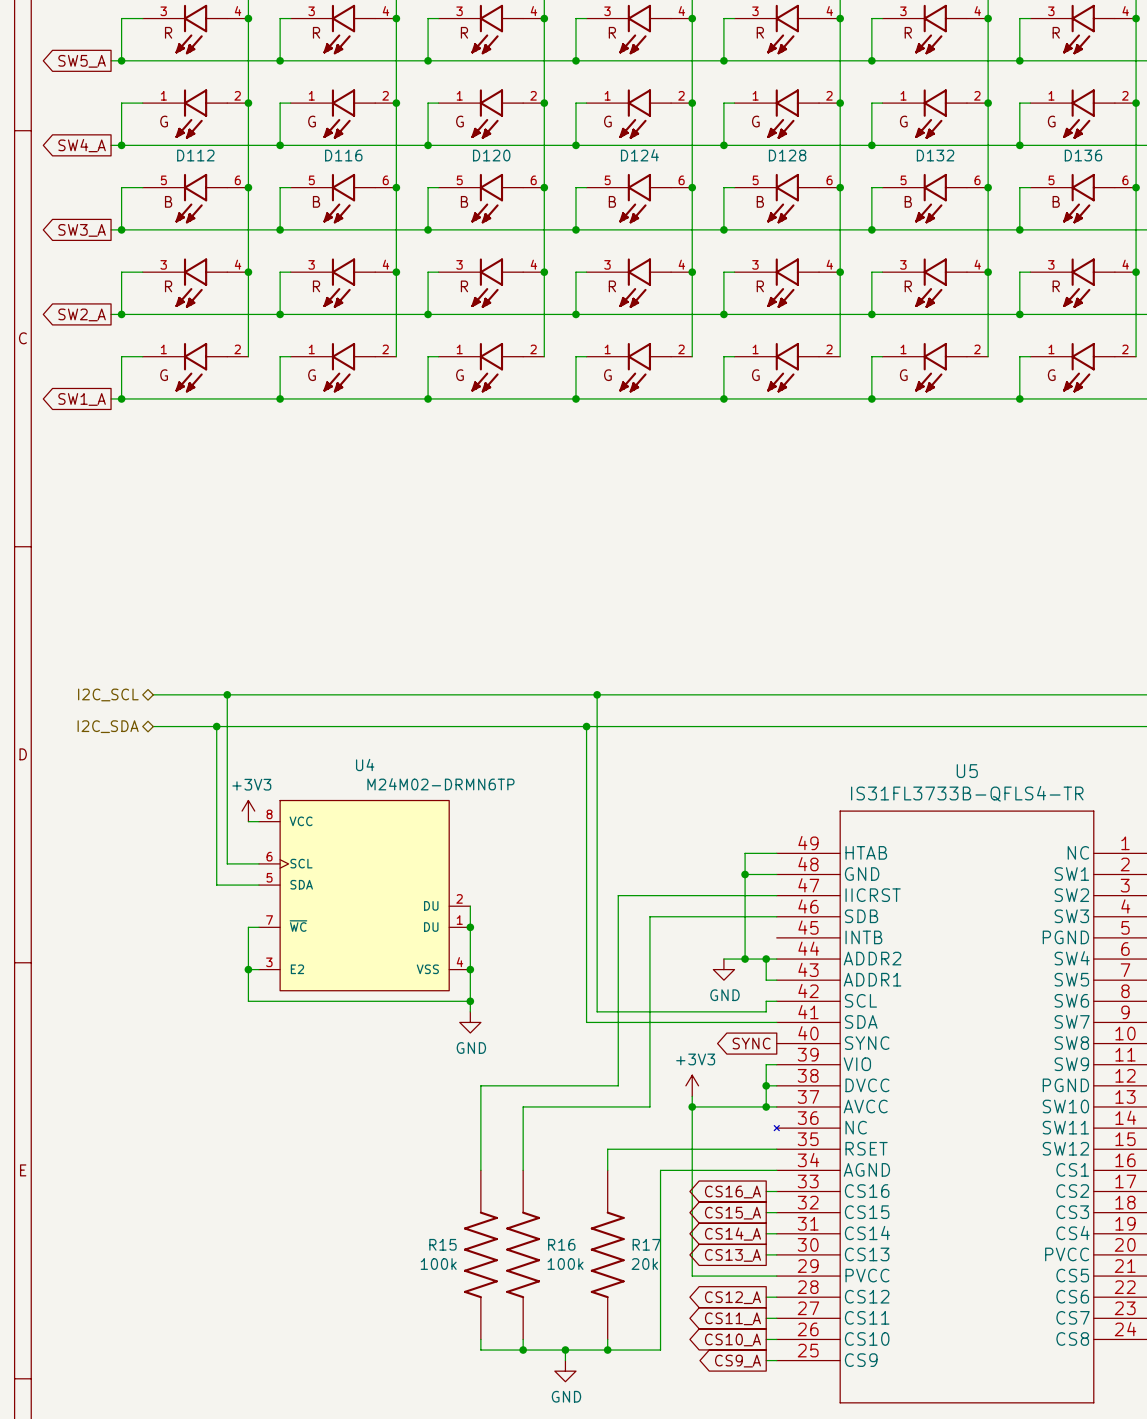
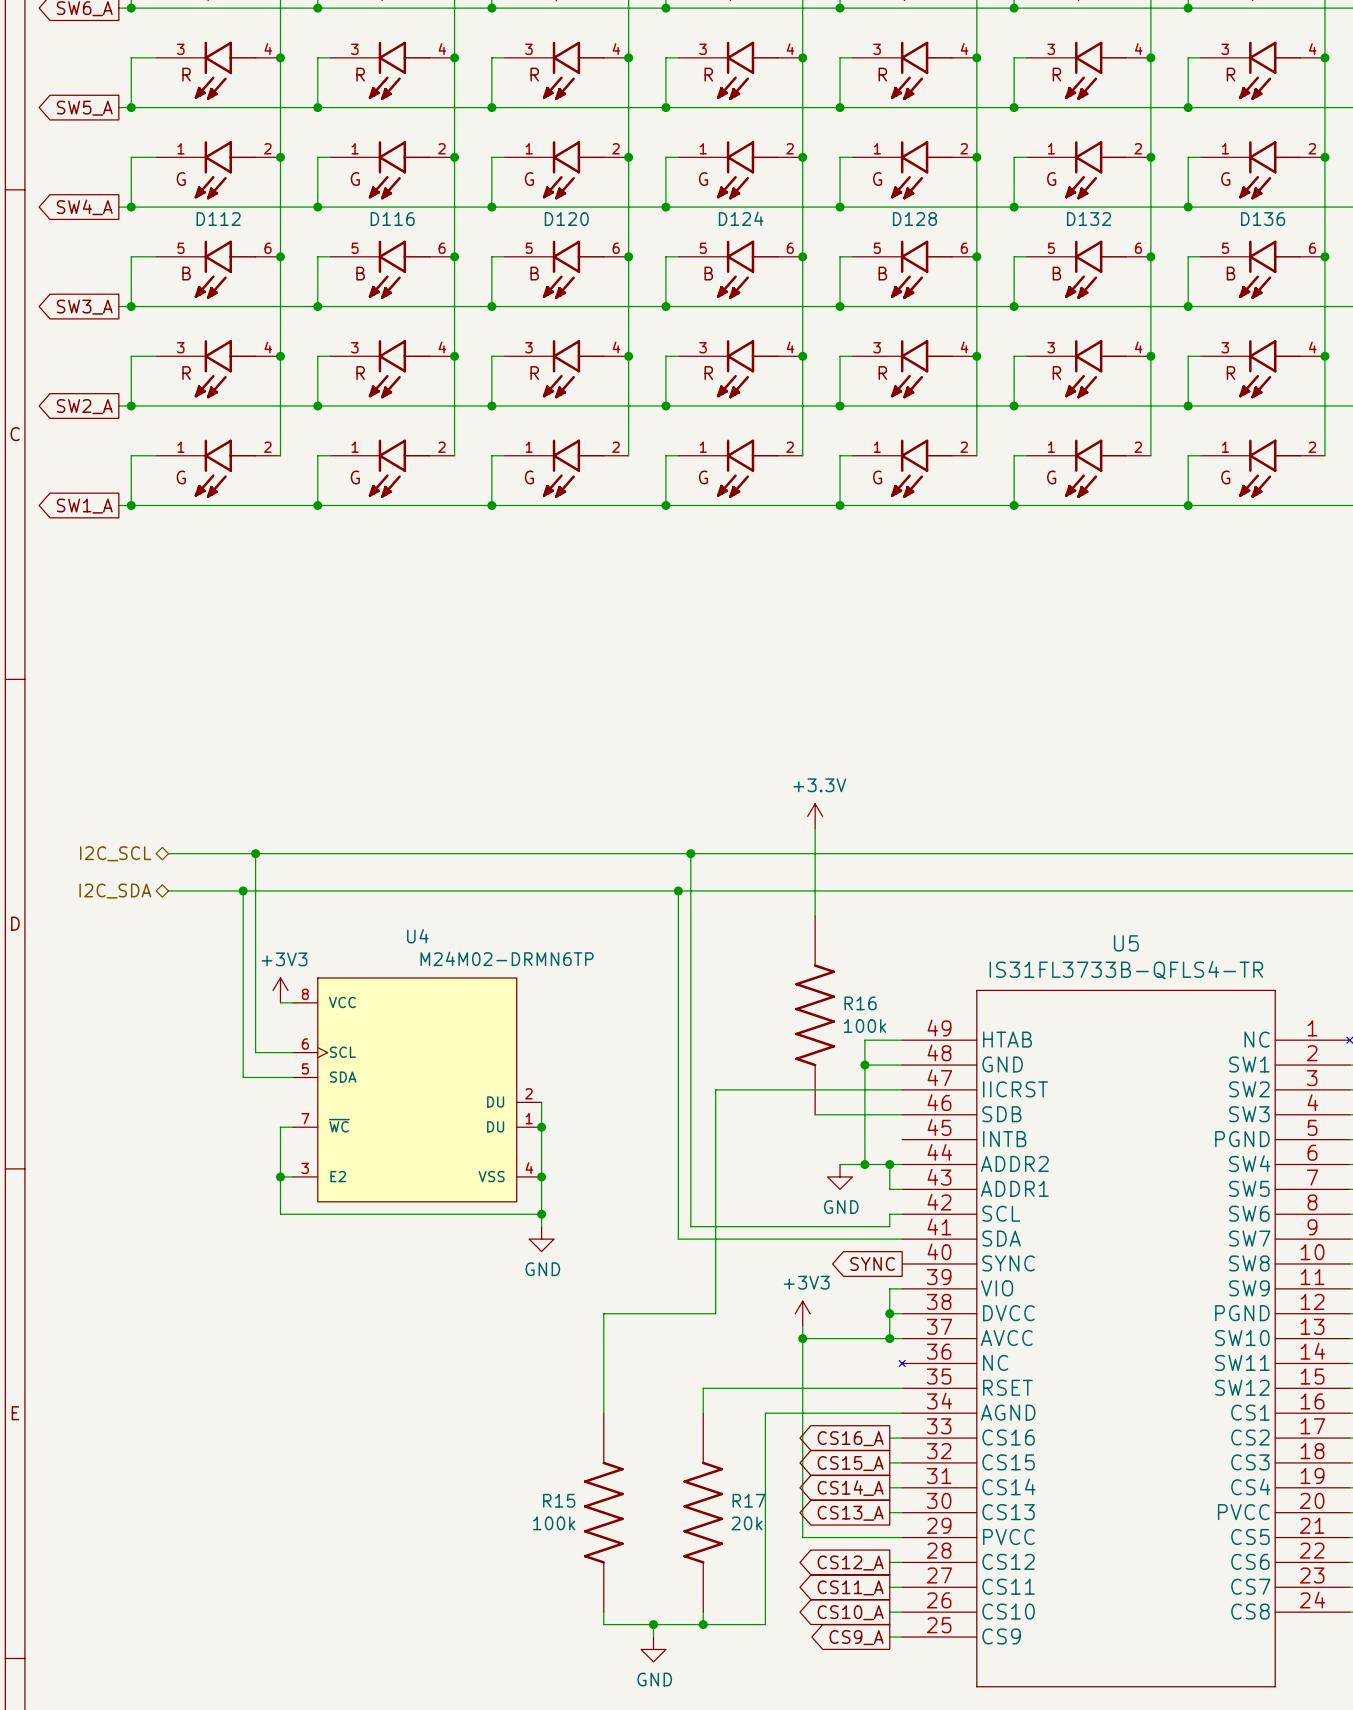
power symbol: none -> +3.3V (815, 816)
wire: none -> (815, 828) (815, 915)
R16: none -> (815, 1015)
wire: (702, 916) (649, 916) (649, 1106) (523, 1106) -> none
wire: (523, 1085) (480, 1085) (480, 1170) -> (603, 1313) (603, 1338)
R16 name: R16 (561, 1244) -> R15 (559, 1500)
R15: (480, 1254) -> none
R16 text position: 100k (565, 1264) -> 100k (554, 1523)
wire: (480, 1339) (480, 1350) (523, 1350) -> none
junction: (523, 1350) -> none

